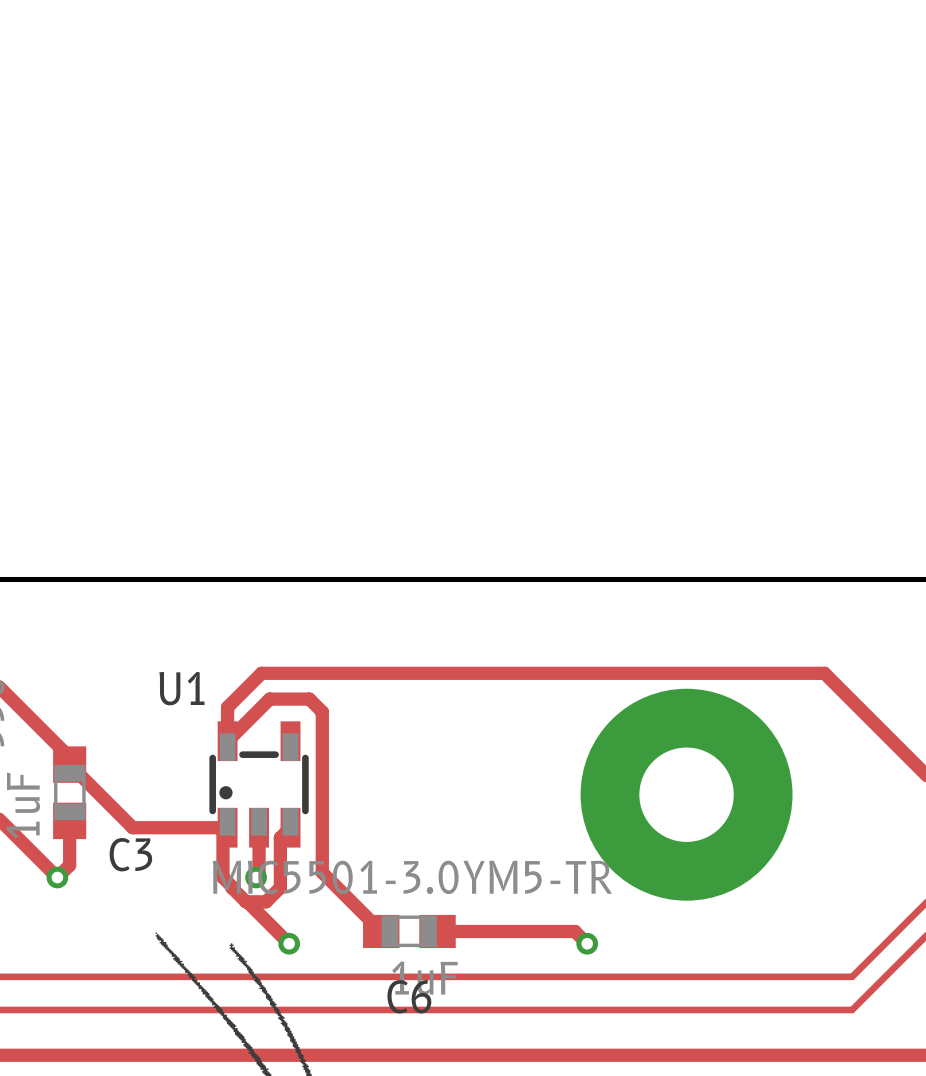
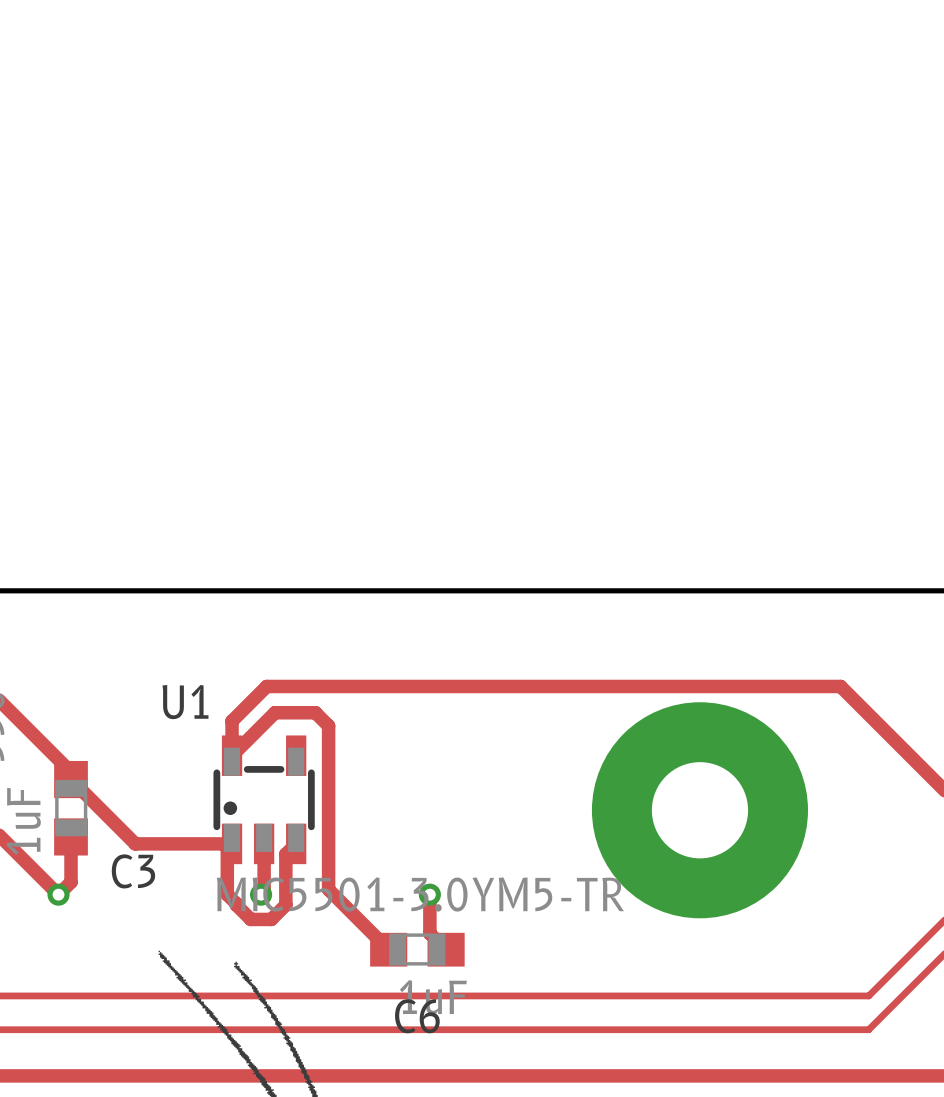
via: none -> (429, 894)
track: (247, 901) (289, 943) -> none
track: (437, 931) (574, 931) (587, 943) -> (446, 949) (429, 933) (429, 894)
via: (289, 943) -> none
via: (587, 943) -> none

